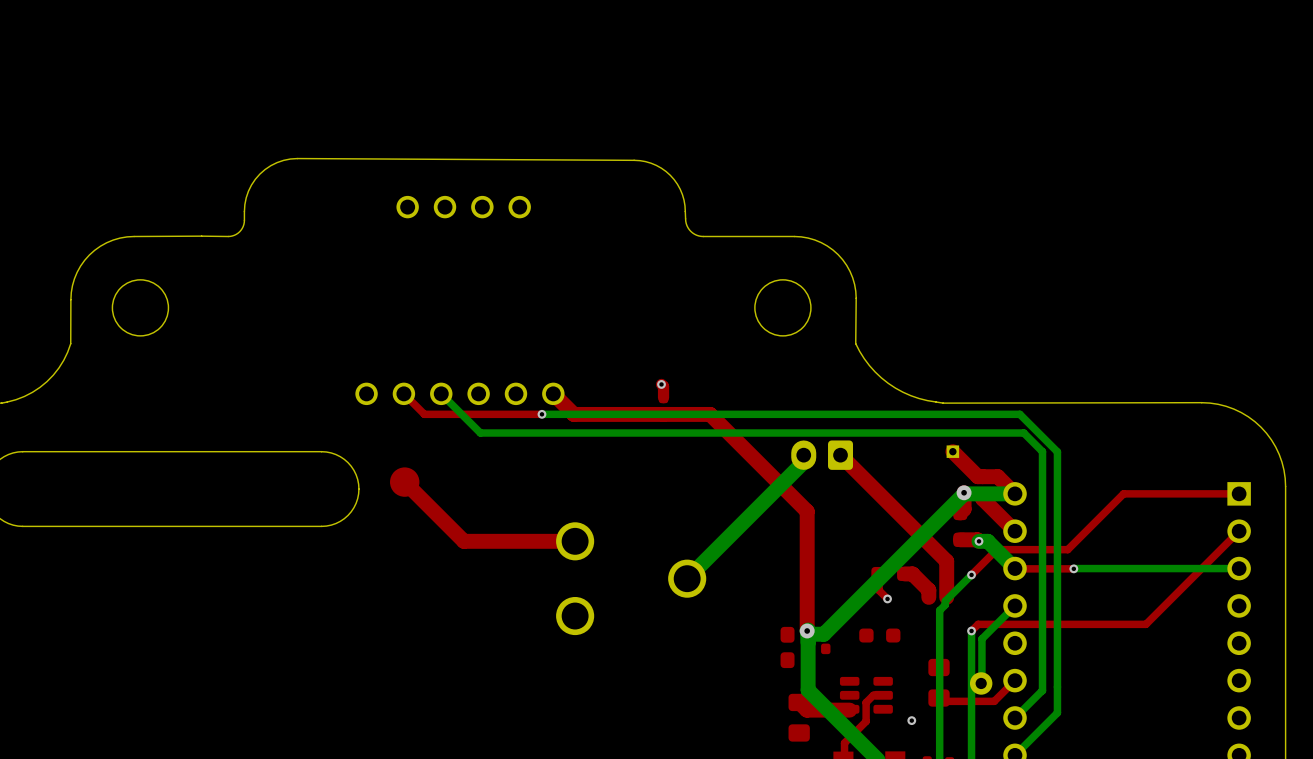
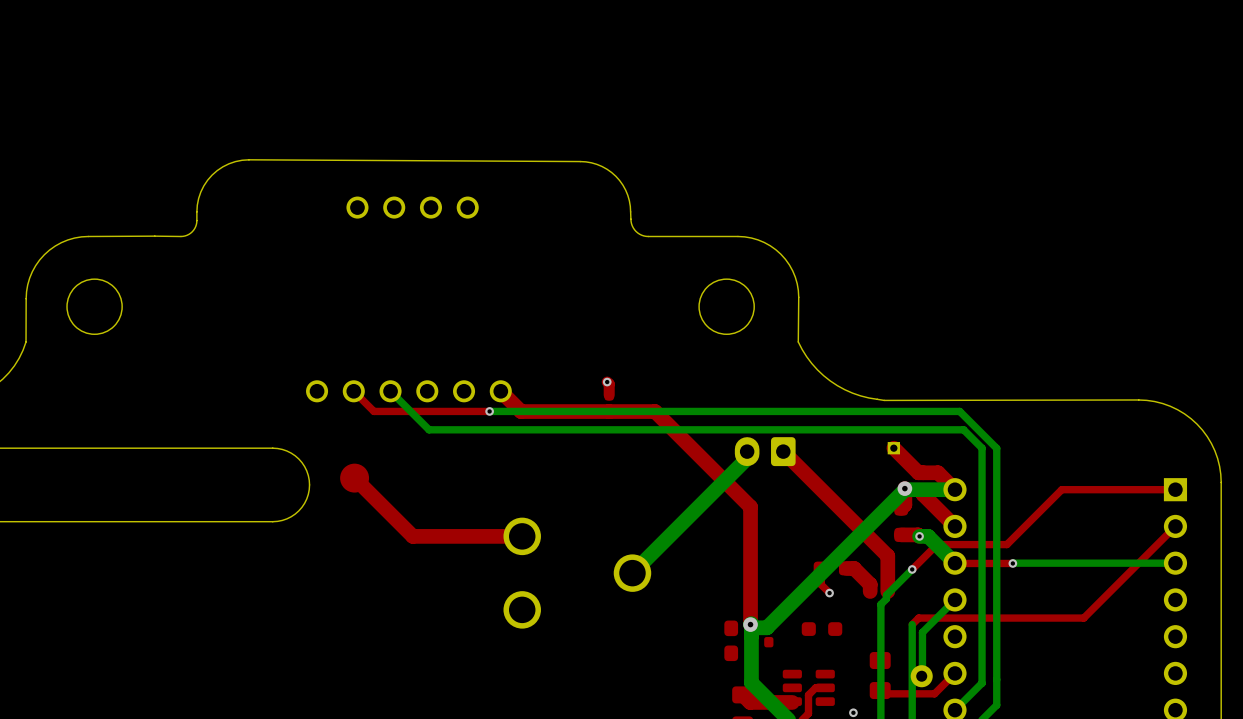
via: (971, 630) -> none

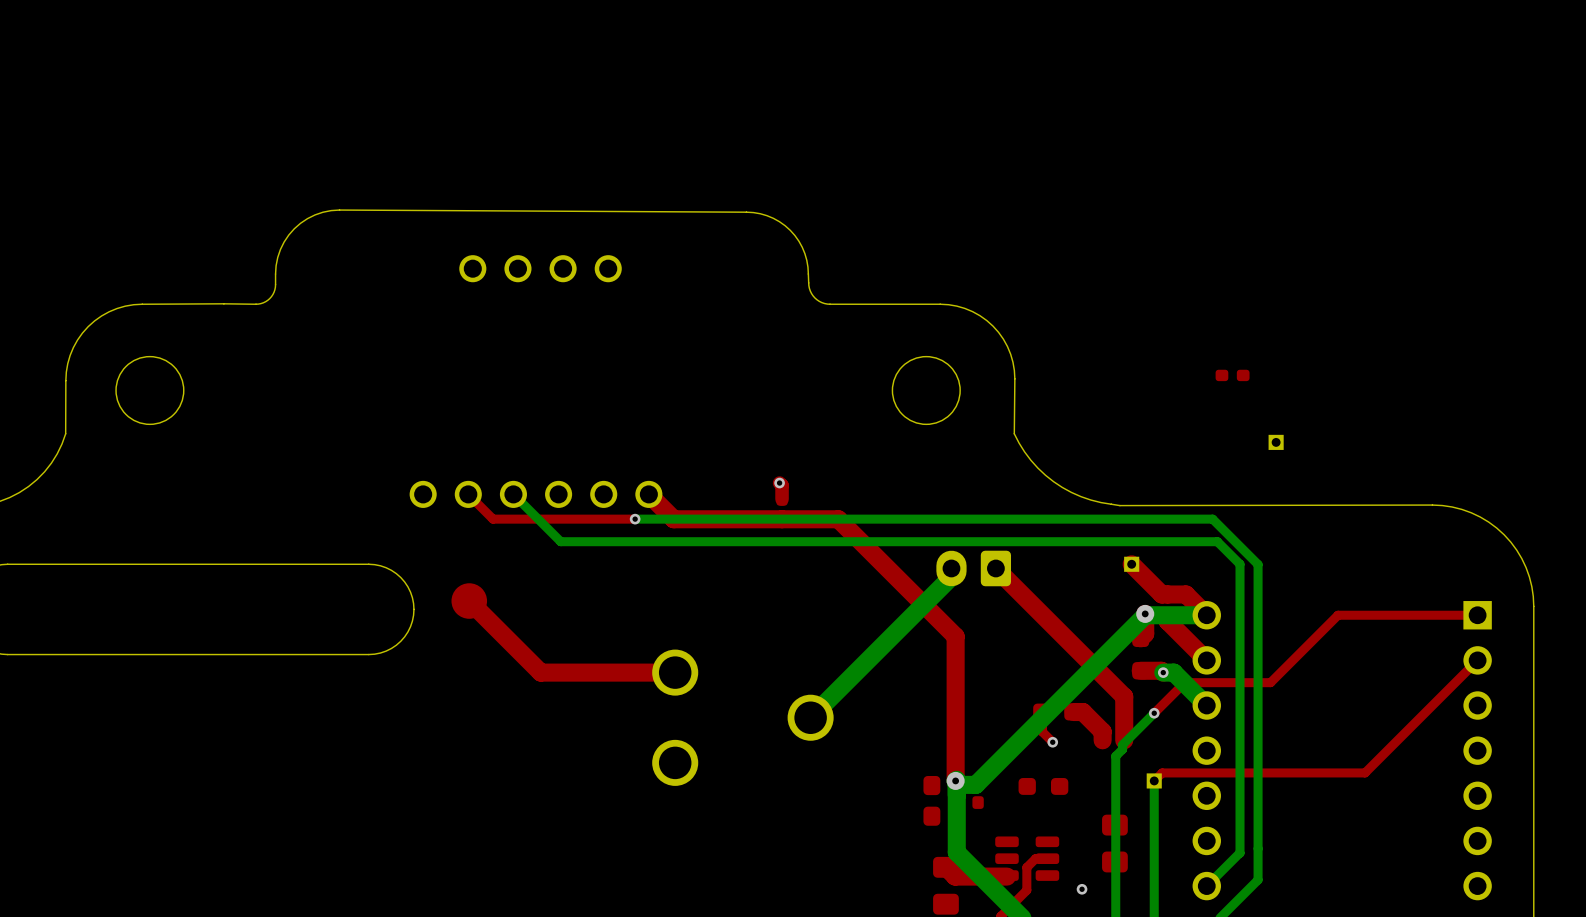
part: none -> (1232, 375)
part: none -> (1276, 442)
top track: (954, 563) (1012, 563) -> none
via: (1012, 563) -> none
bottom track: (1175, 563) (1012, 563) -> none
bottom track: (954, 599) (922, 632) (922, 675) -> none
part: none -> (1154, 780)
top track: (954, 673) (934, 693) (883, 693) (880, 690) -> none
part: (921, 676) -> none

